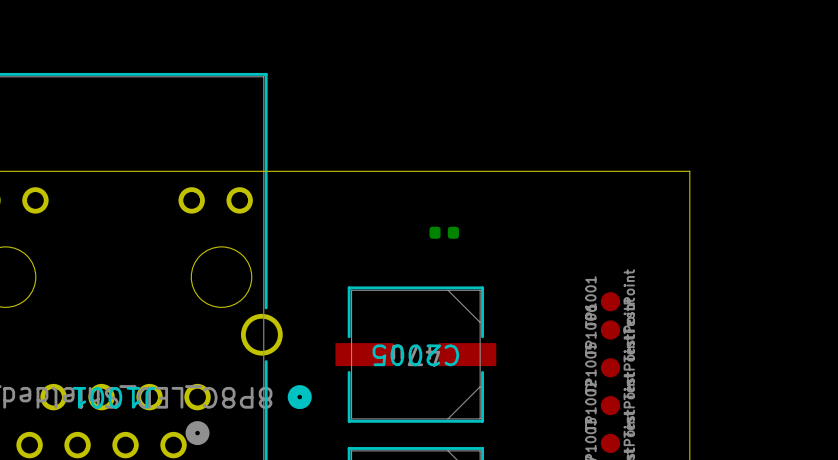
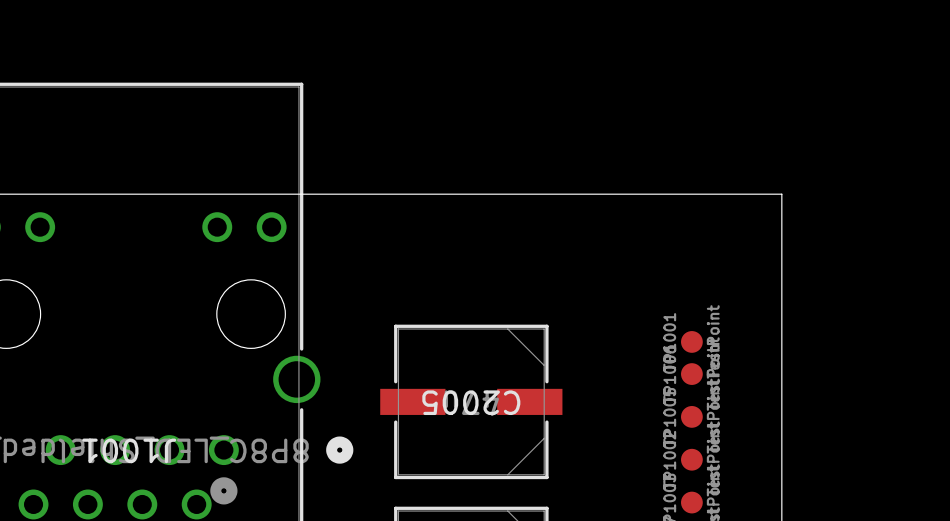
part: (444, 232) -> none

